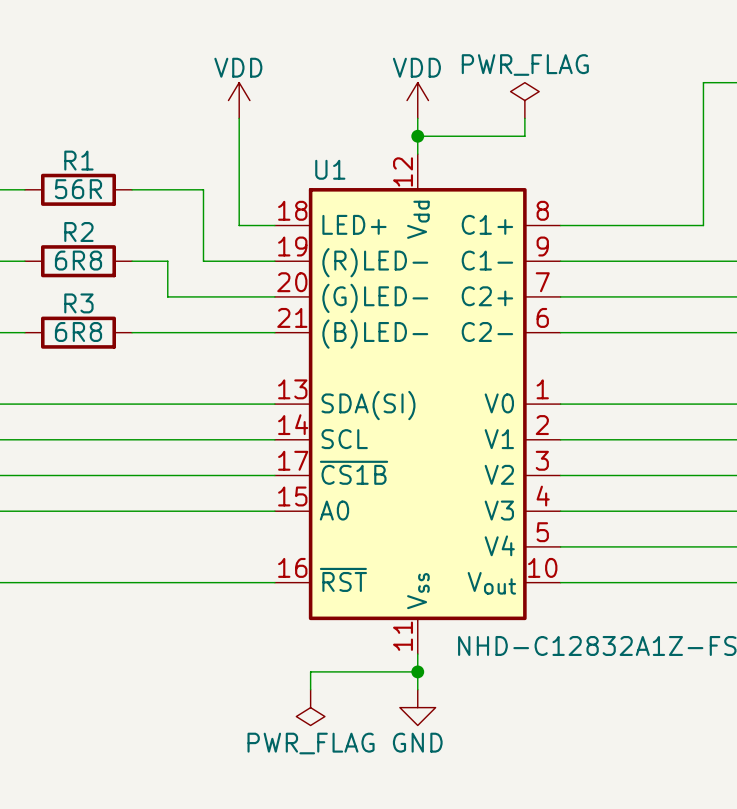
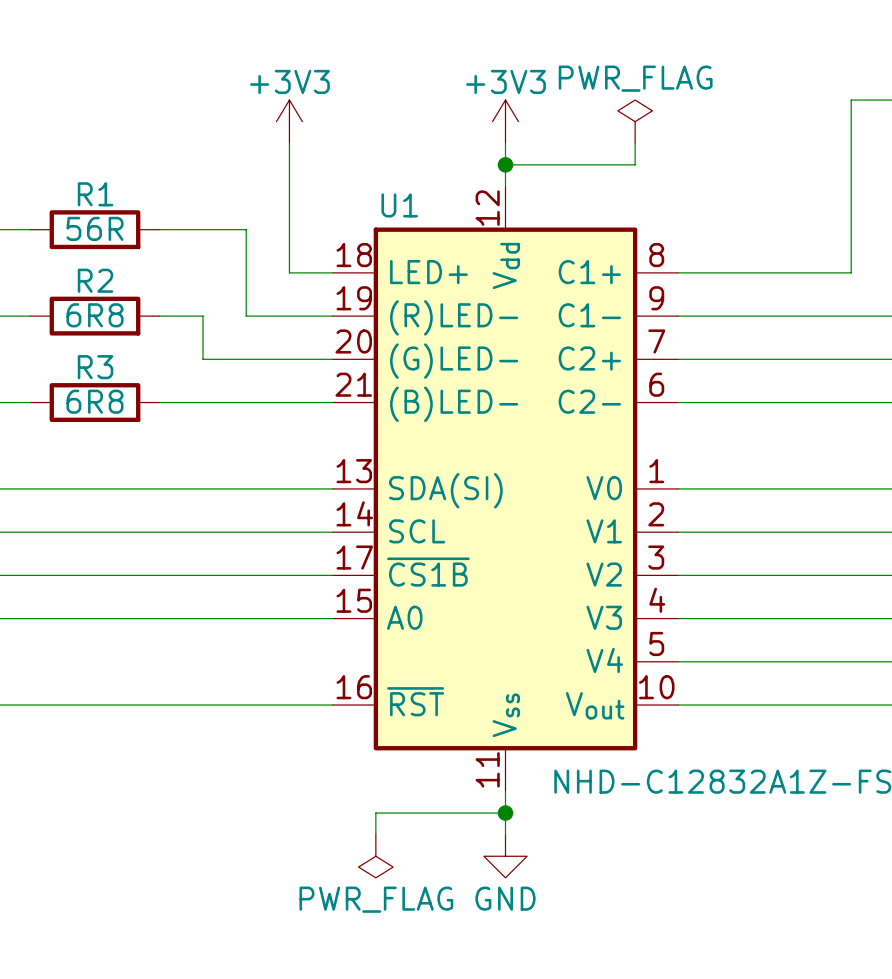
power symbol: VDD (239, 100) -> +3V3 (289, 121)
power symbol: VDD (417, 100) -> +3V3 (505, 121)

